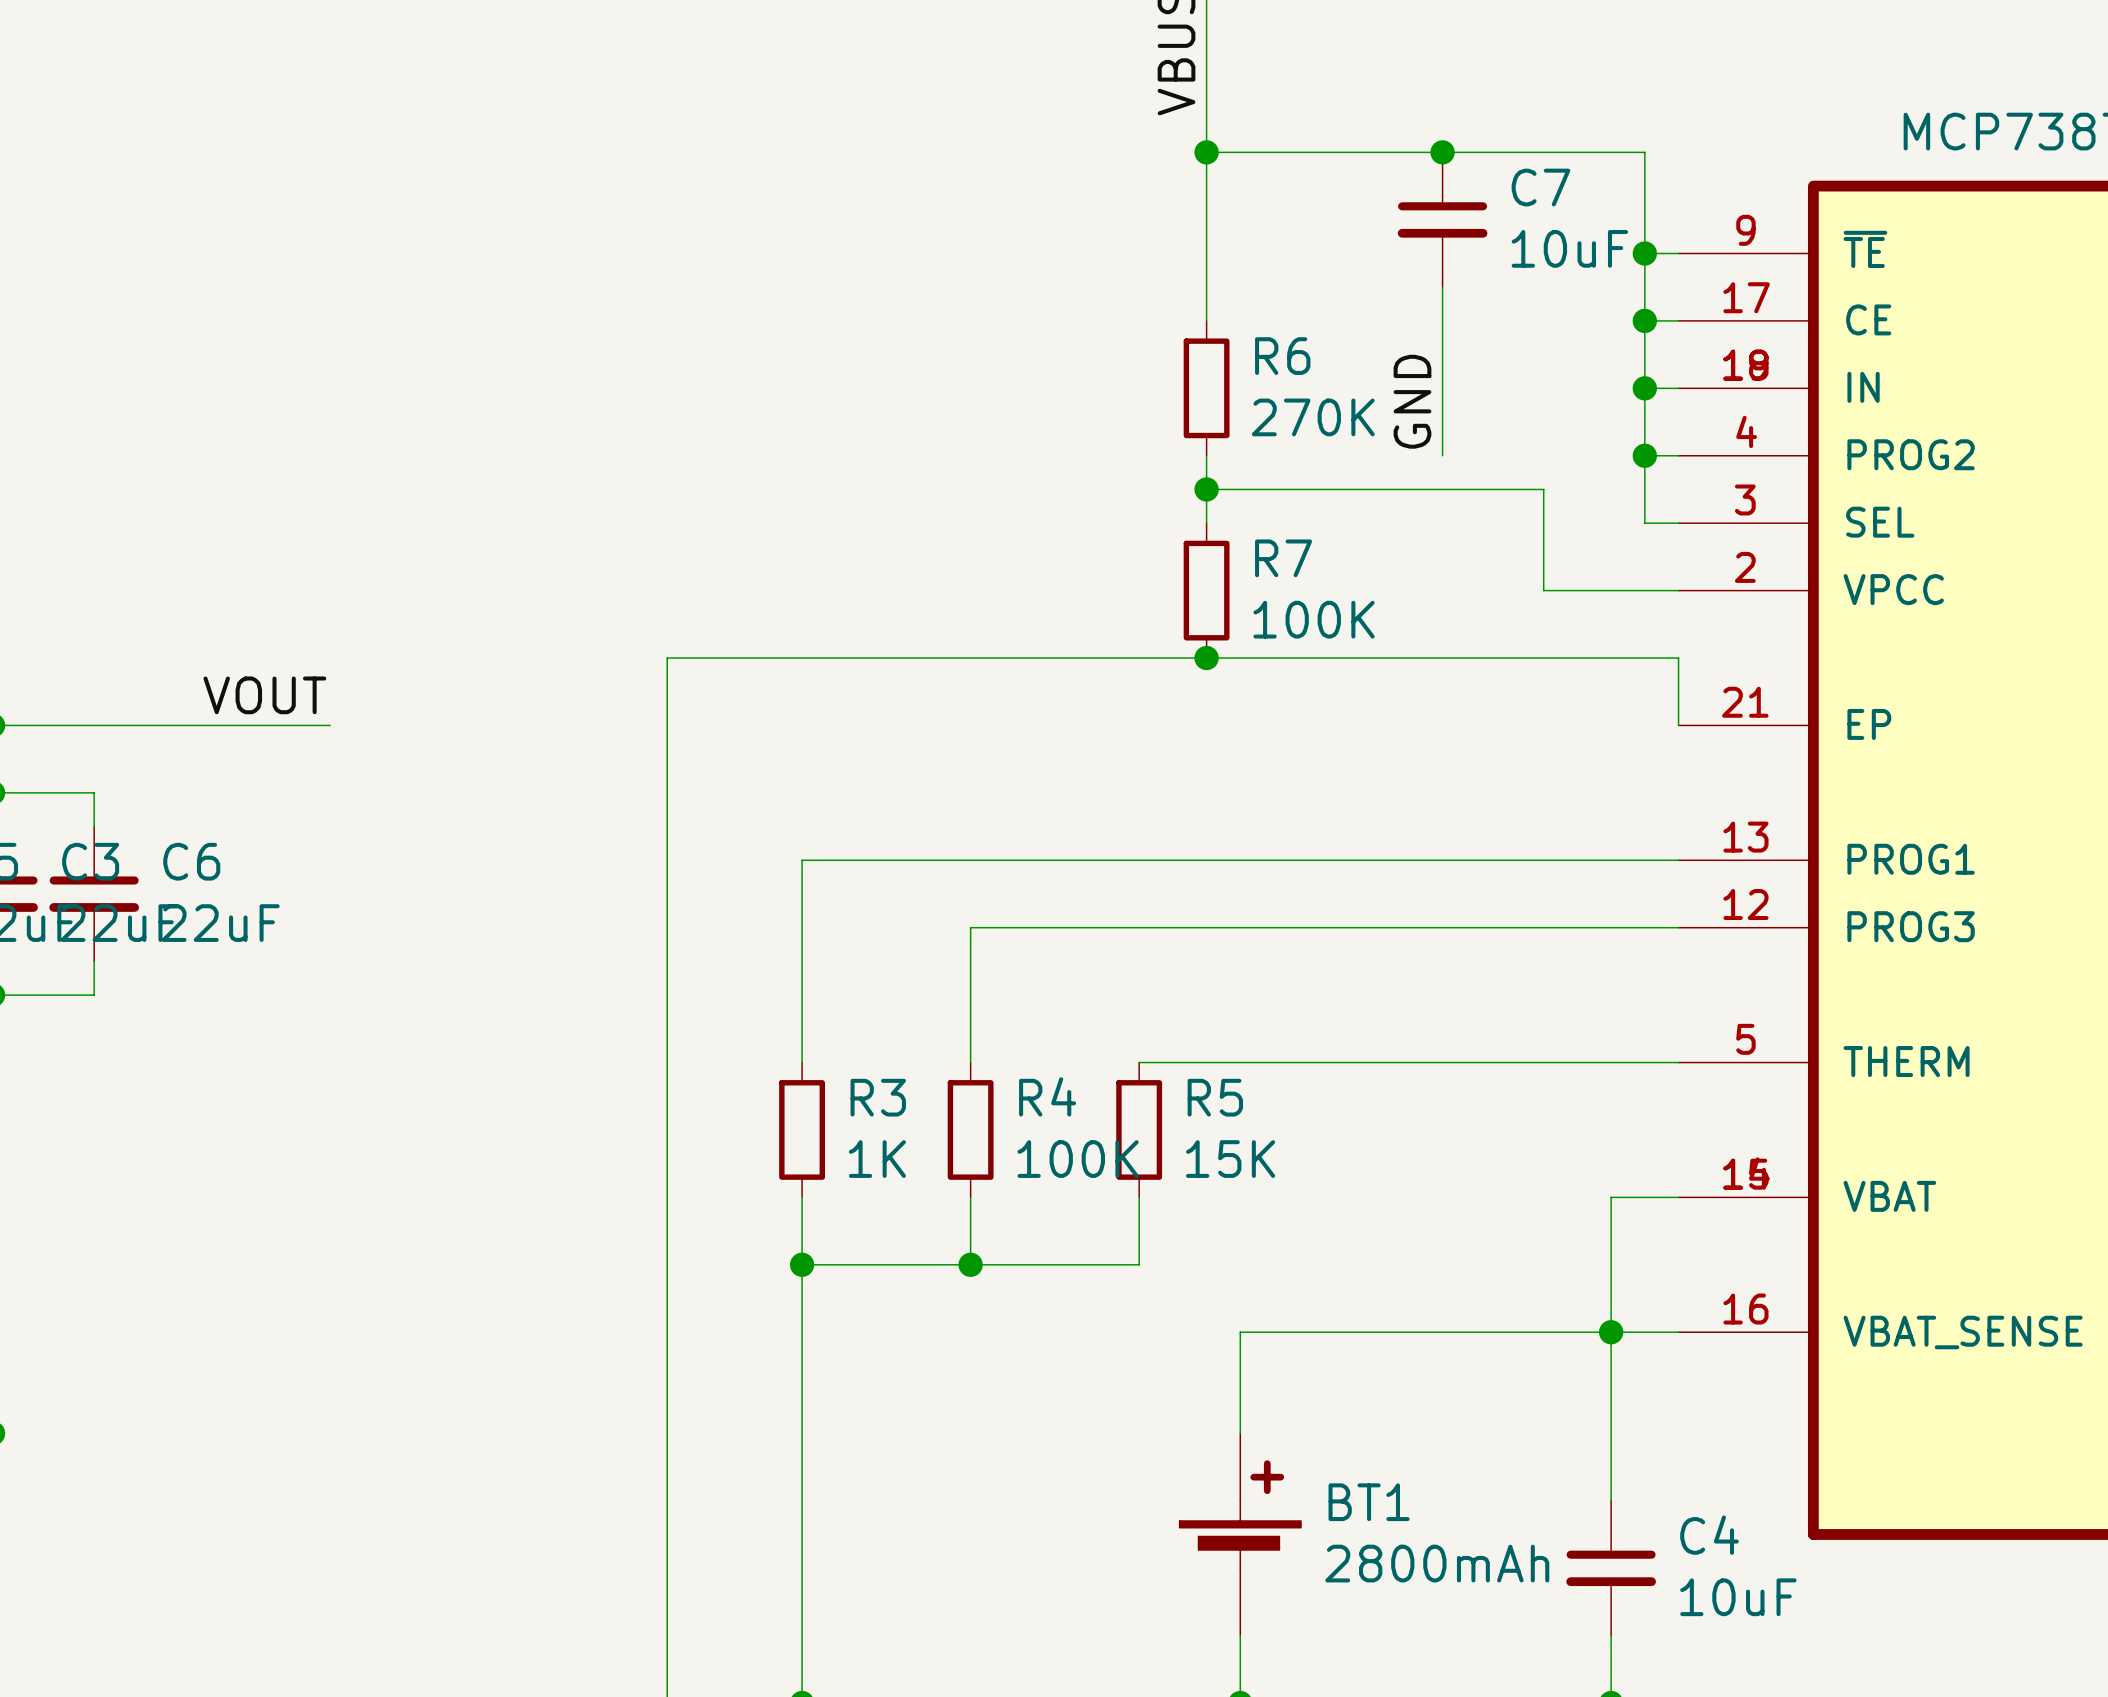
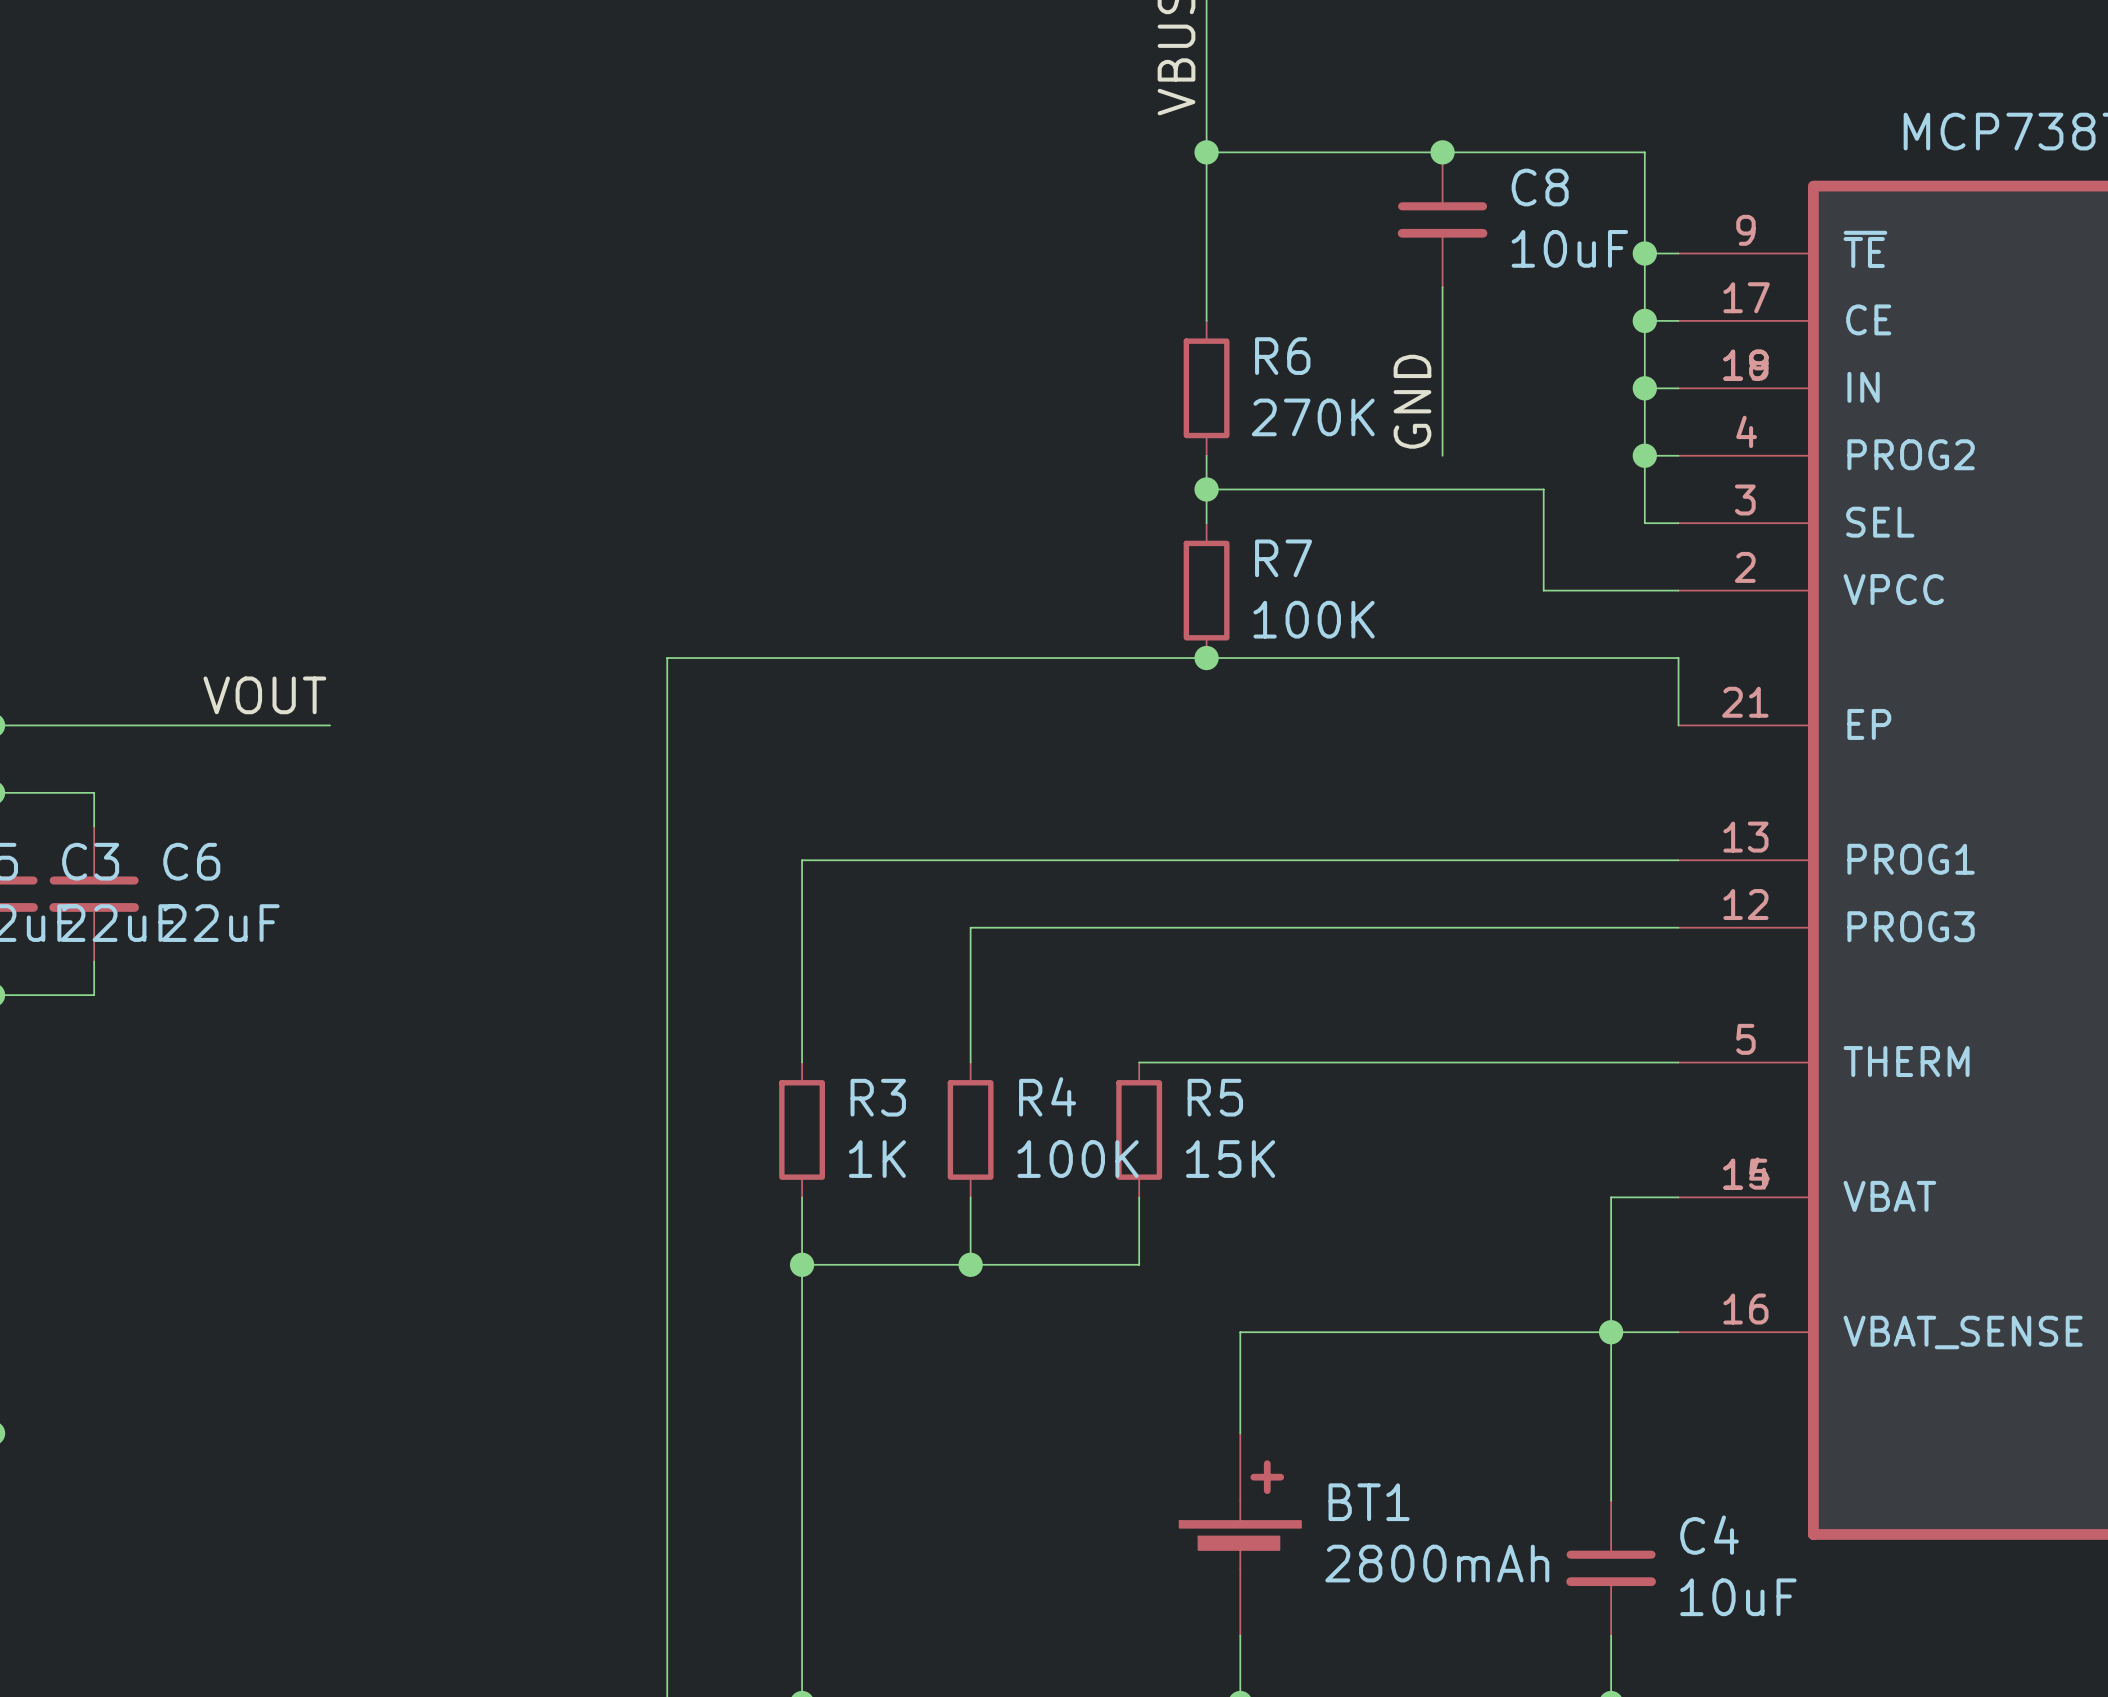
C7 name: C7 (1540, 187) -> C8 (1540, 187)

